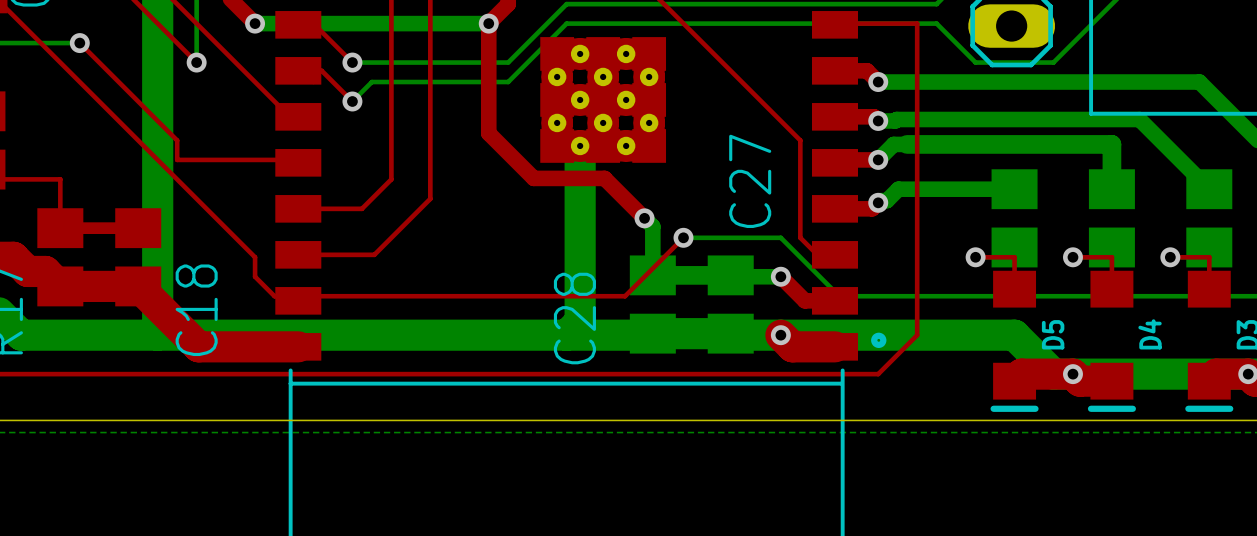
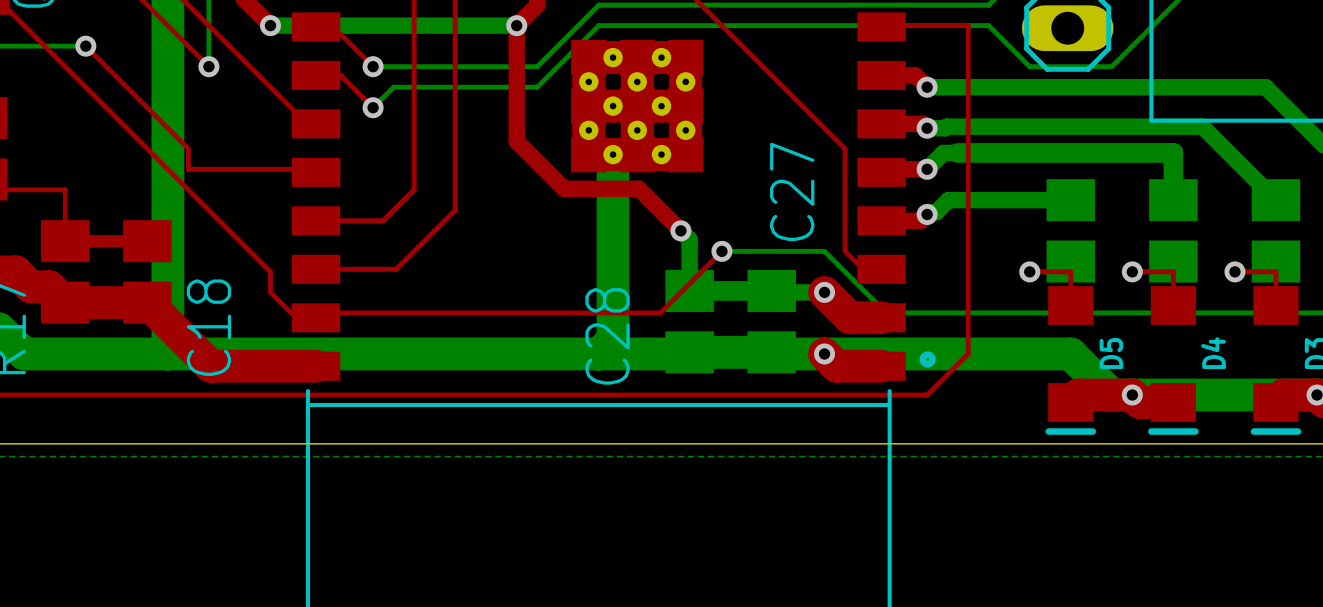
top track width: thin (780, 276) (804, 300) (834, 300) -> thick (824, 292) (849, 317) (881, 317)

